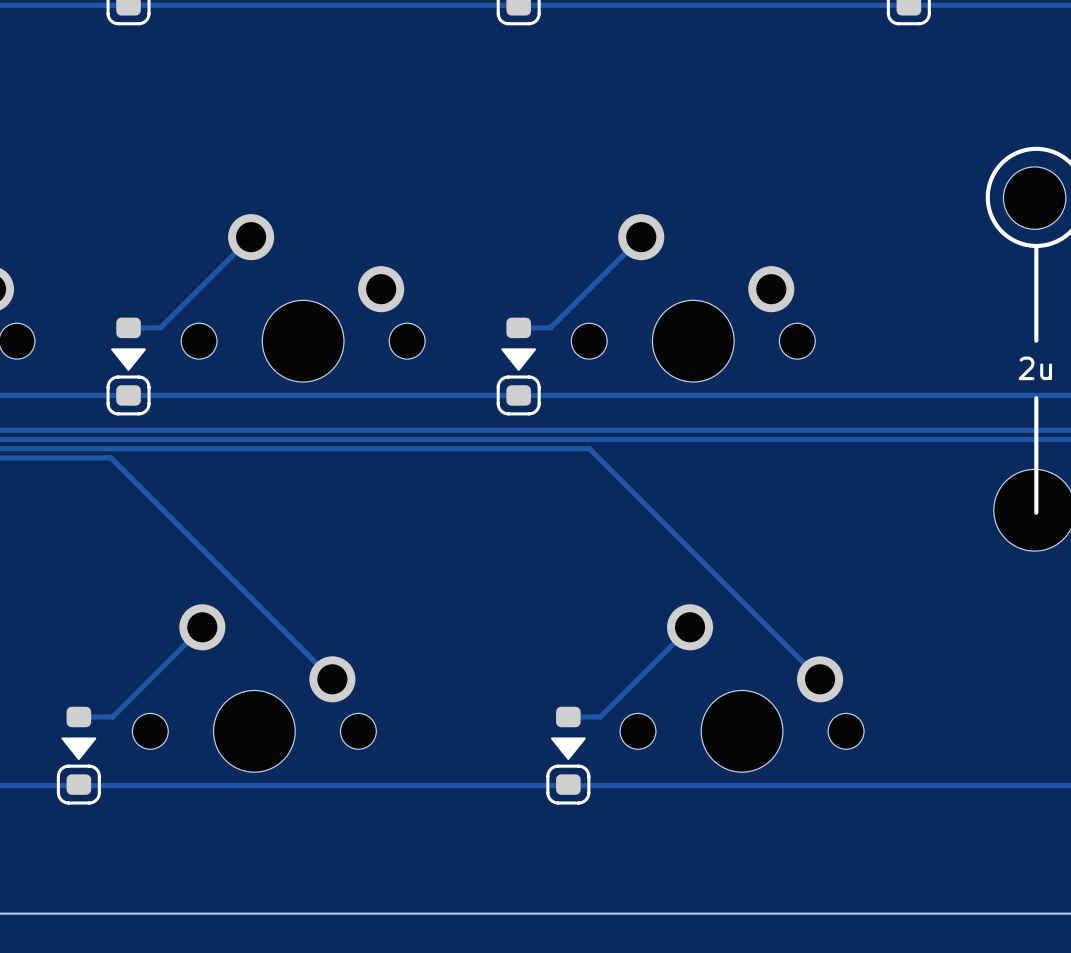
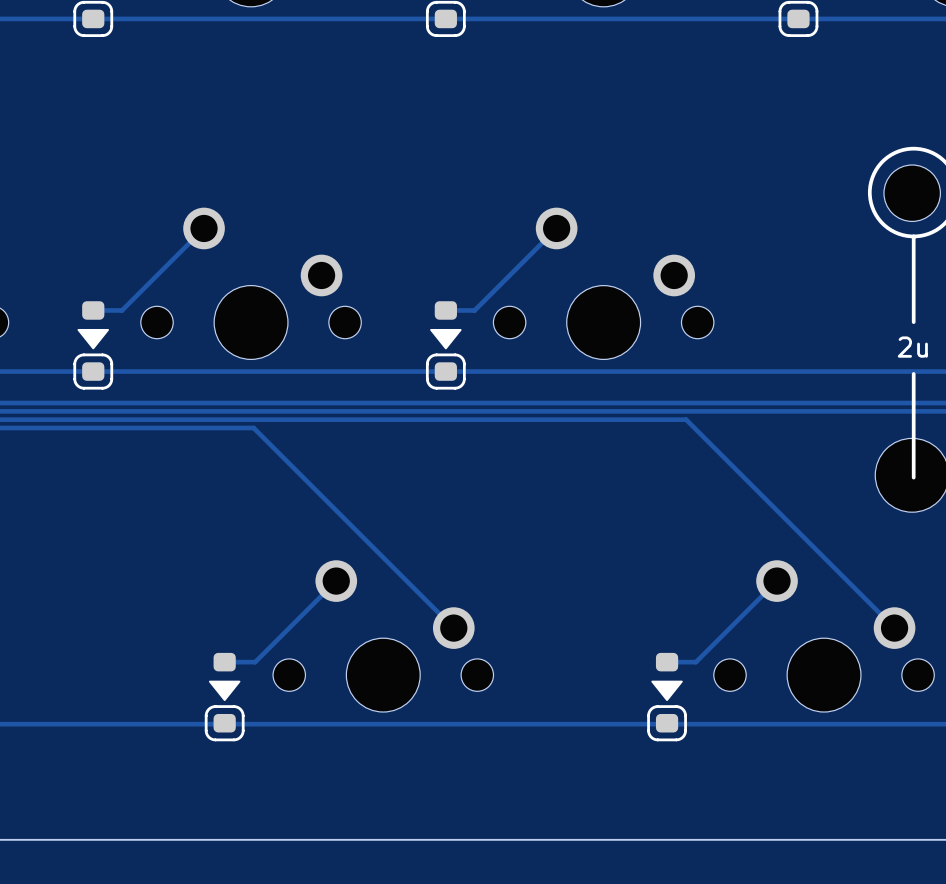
track: (589, 448) (820, 679) -> (509, 419) (686, 419) (894, 628)
track: (111, 457) (332, 679) -> (77, 428) (253, 428) (453, 628)
track: (202, 627) (112, 716) (78, 716) -> (336, 581) (255, 662) (224, 662)
track: (690, 627) (600, 716) (568, 716) -> (777, 581) (695, 662) (667, 662)
part: (254, 688) -> none
part: none -> (383, 636)
part: (742, 688) -> none
part: none -> (824, 636)
part: (78, 755) -> none
part: none -> (224, 697)
part: (568, 755) -> none
part: none -> (667, 697)

